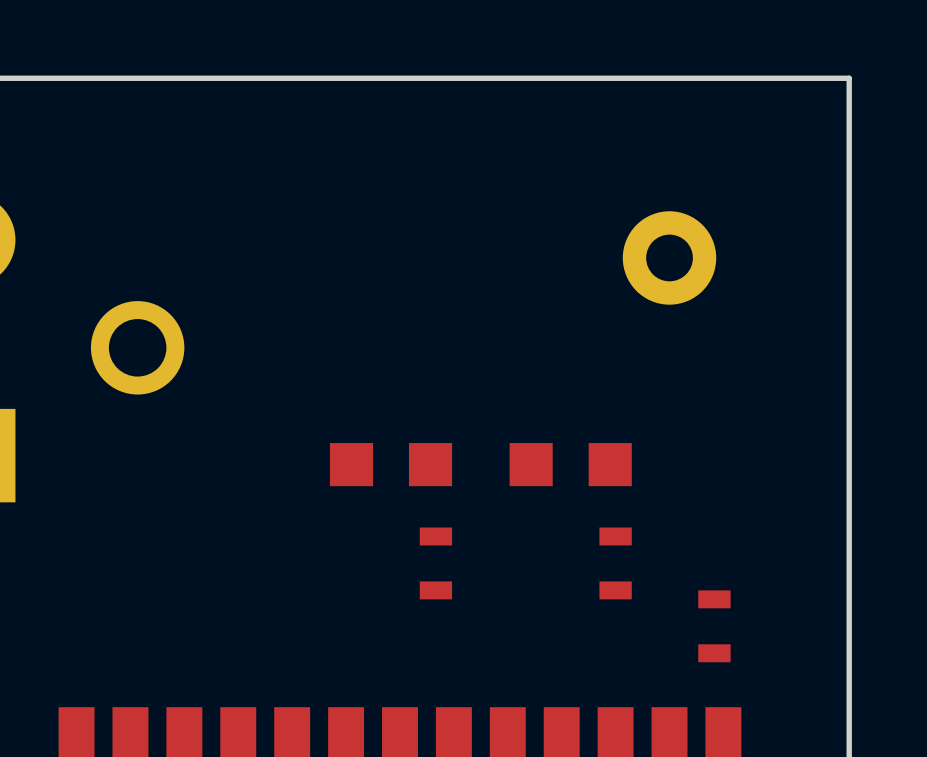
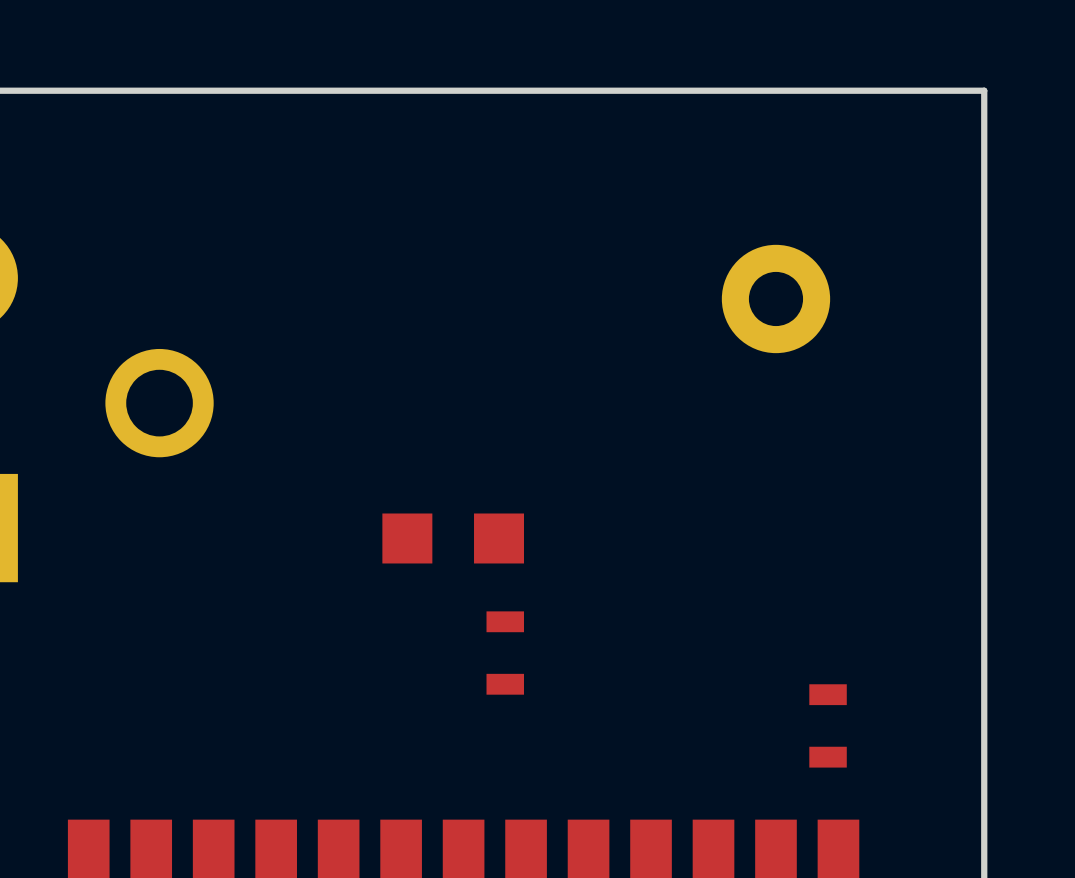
part: (570, 464) -> none
part: (615, 563) -> none

